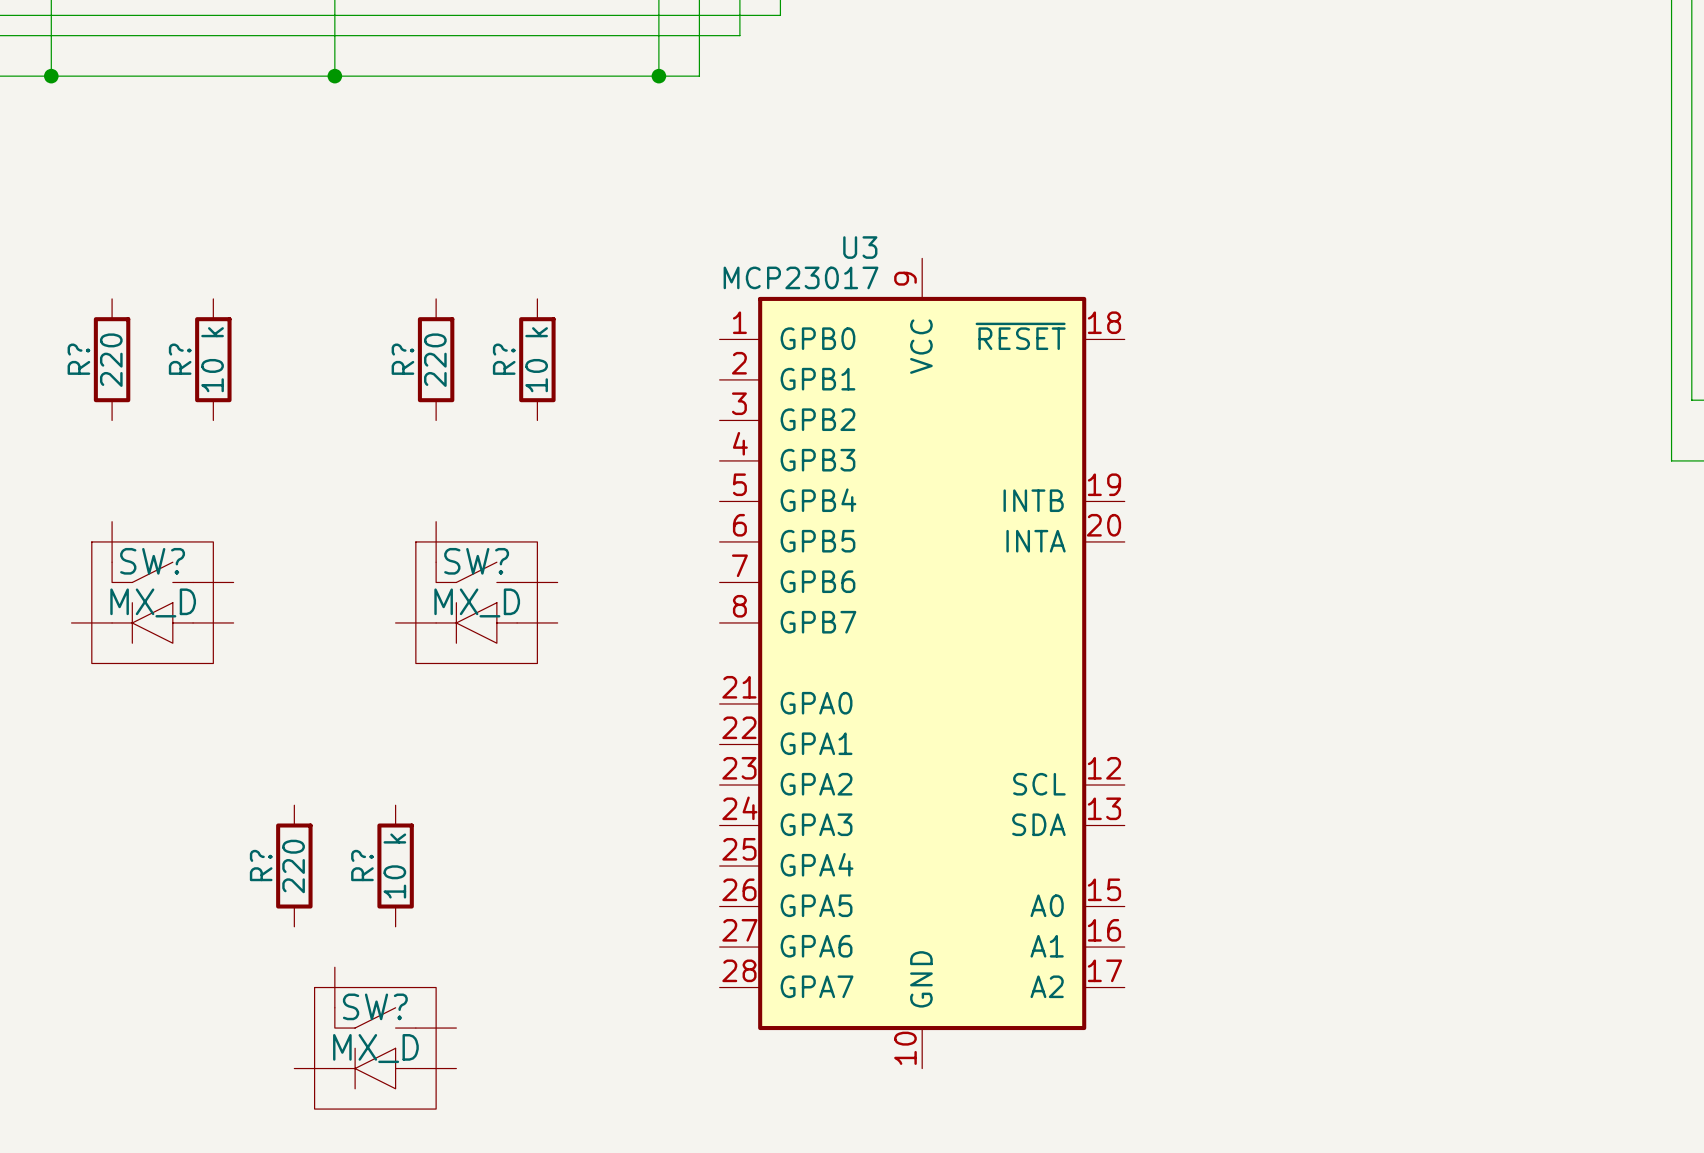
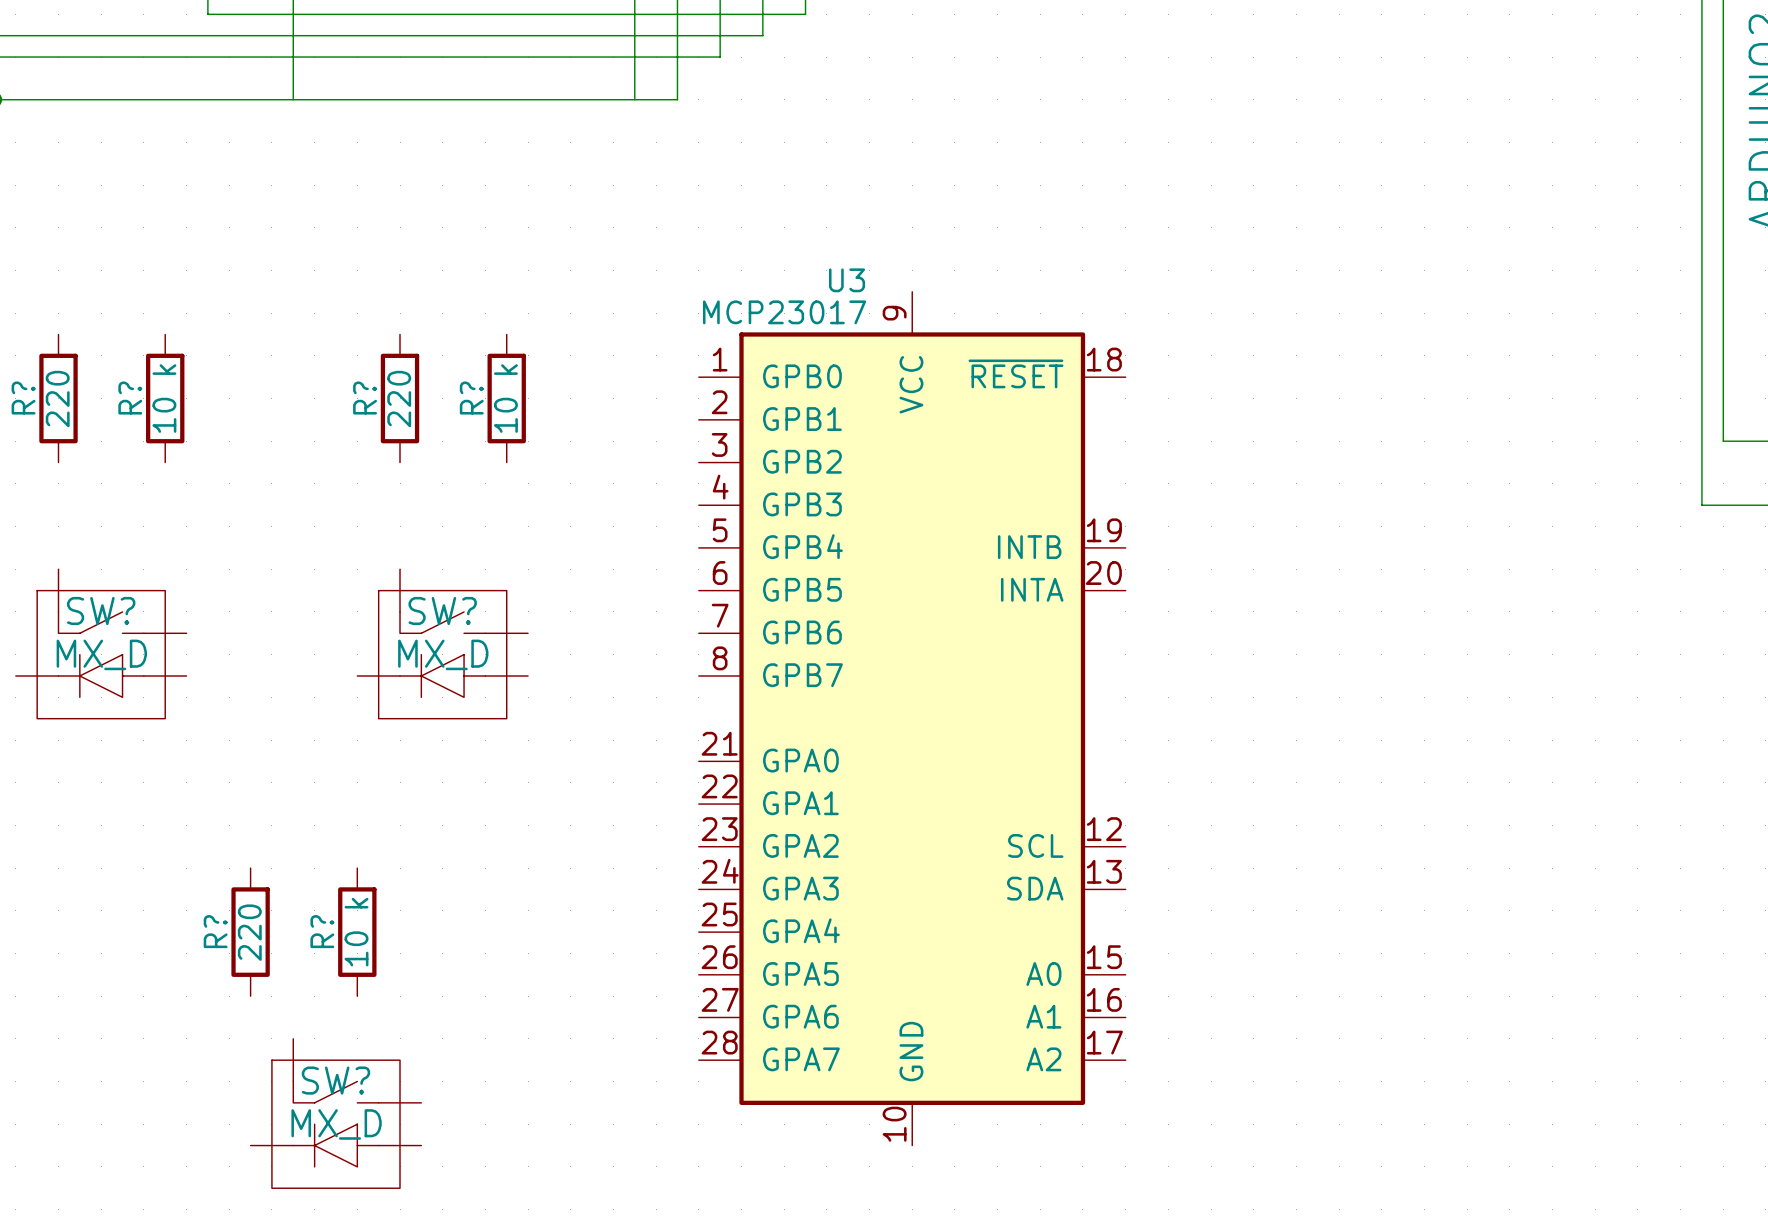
junction: (334, 76) -> none
junction: (658, 76) -> none

